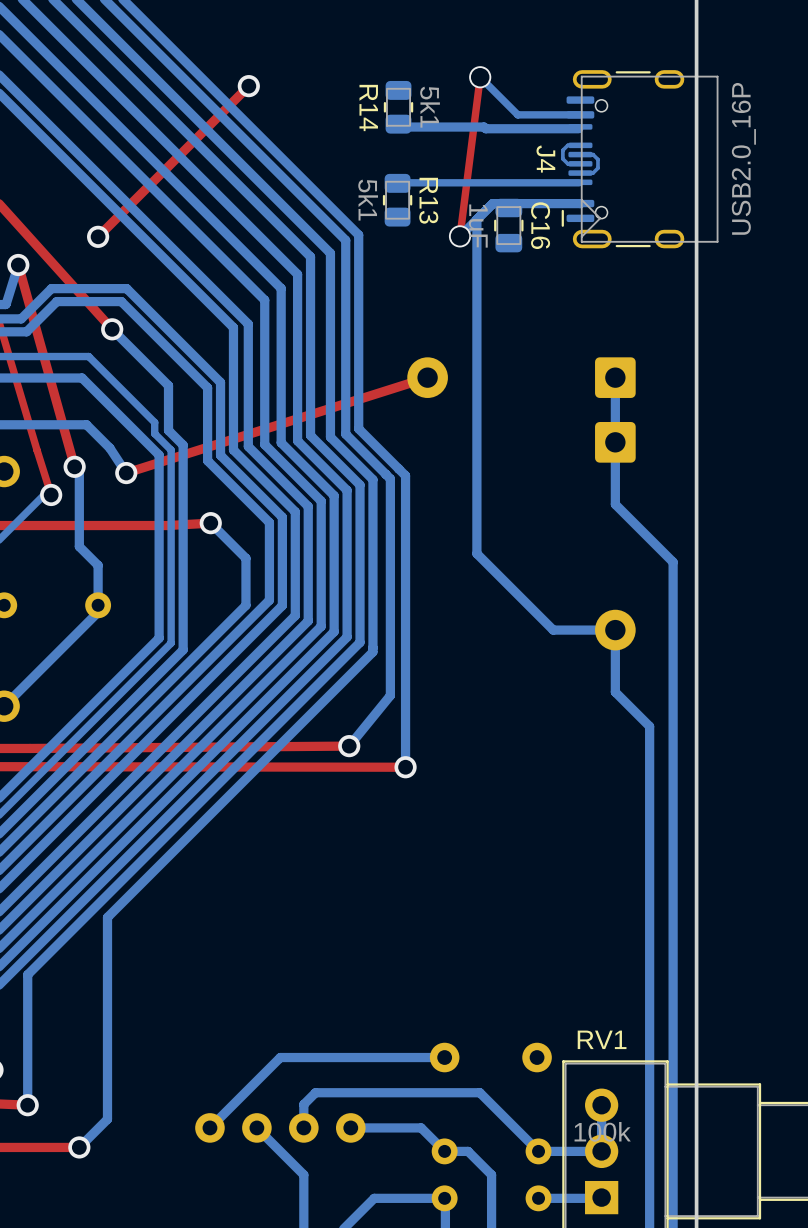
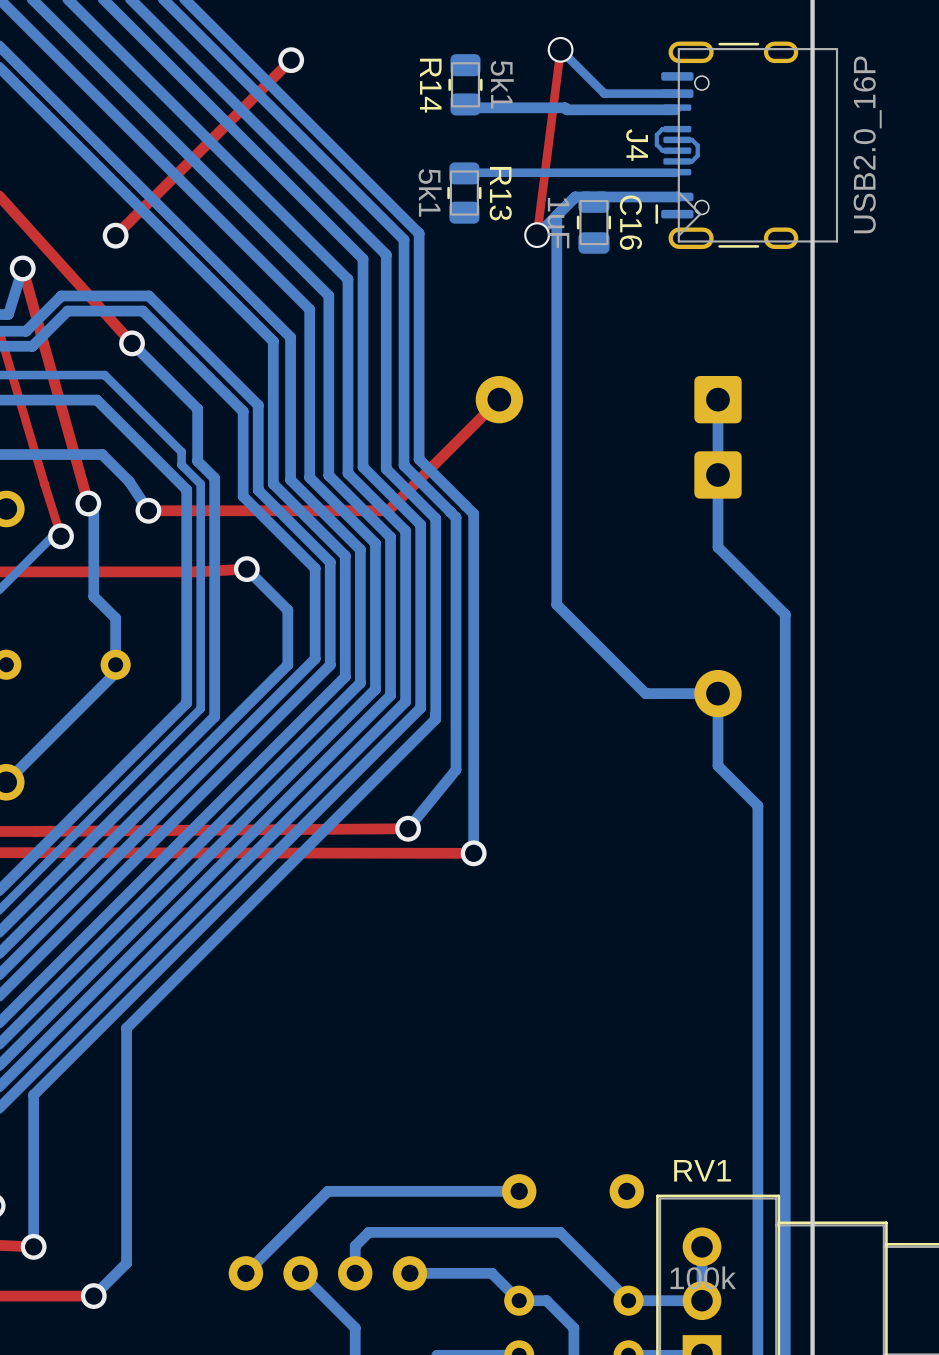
top track: (427, 377) (126, 473) -> (499, 399) (388, 510) (148, 510)

